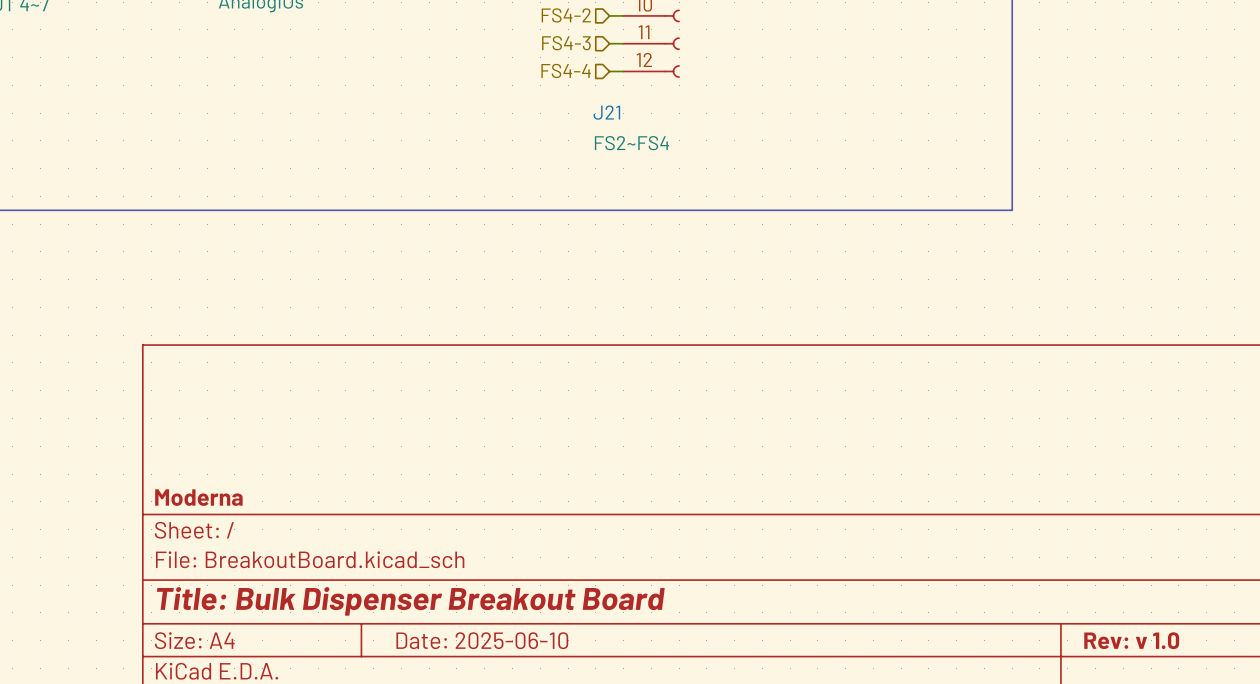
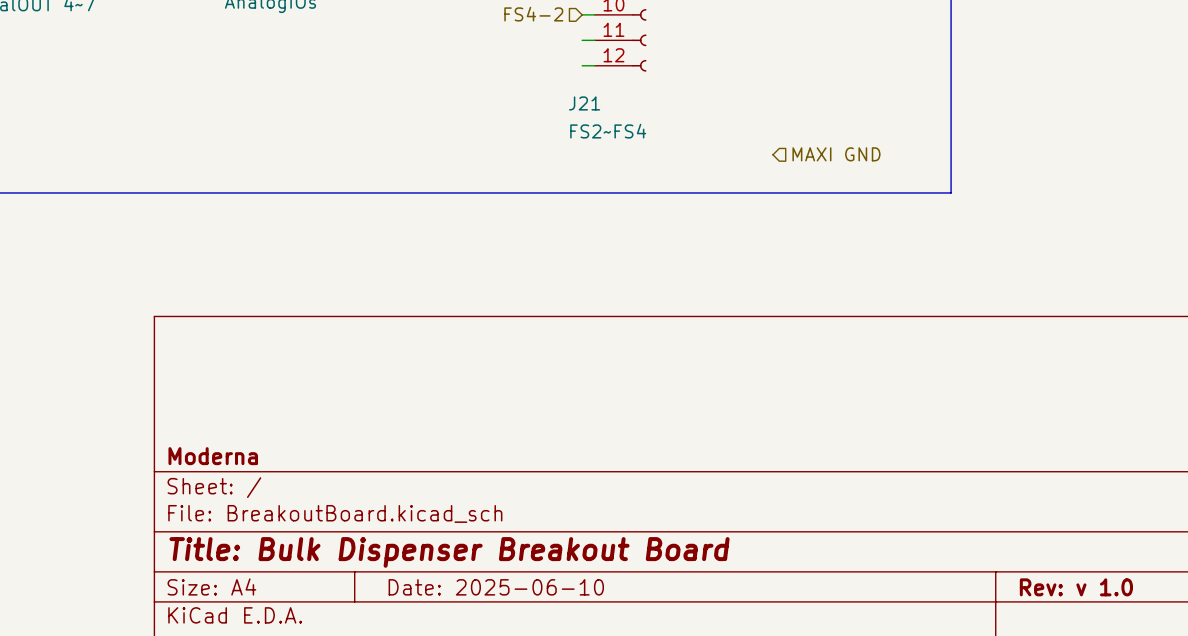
hierarchical label: FS4-3 (566, 43) -> none
hierarchical label: FS4-4 (566, 70) -> none
hierarchical label: none -> MAXI GND (836, 154)

